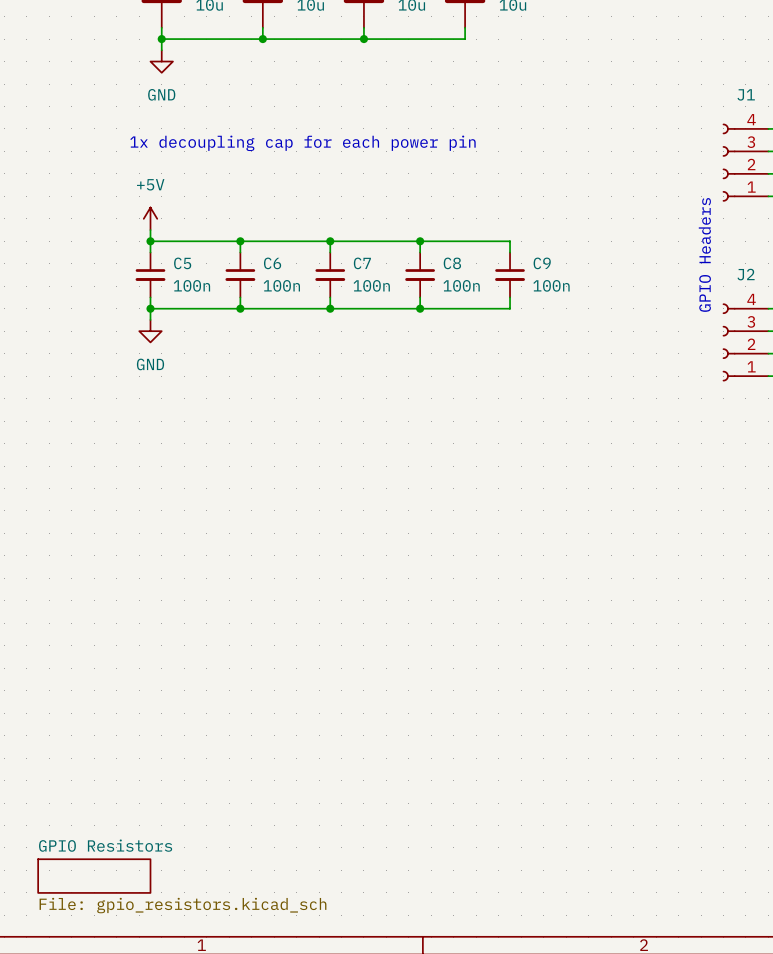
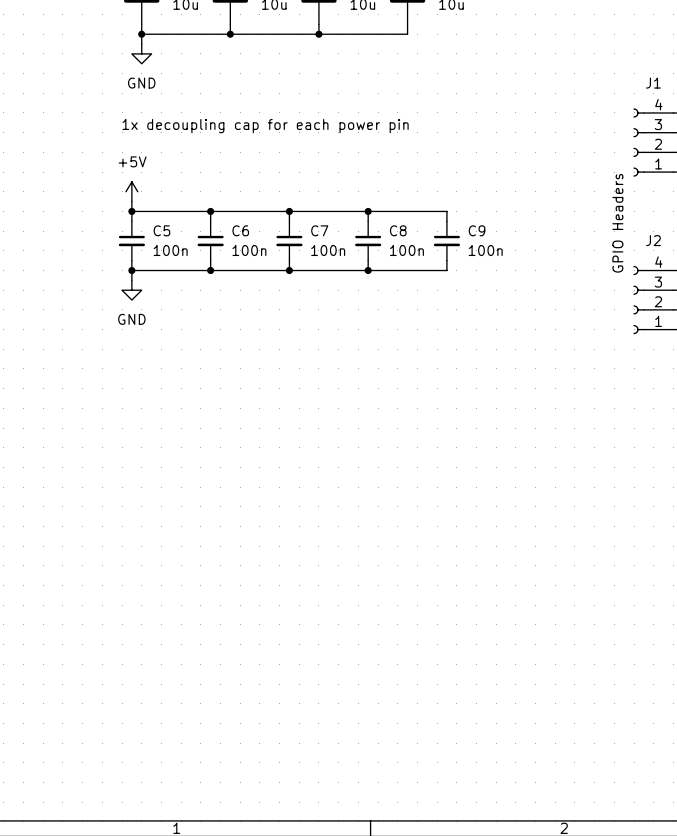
sheet GPIO Resistors: File: gpio_resistors.kicad_sch (94, 876) -> none

